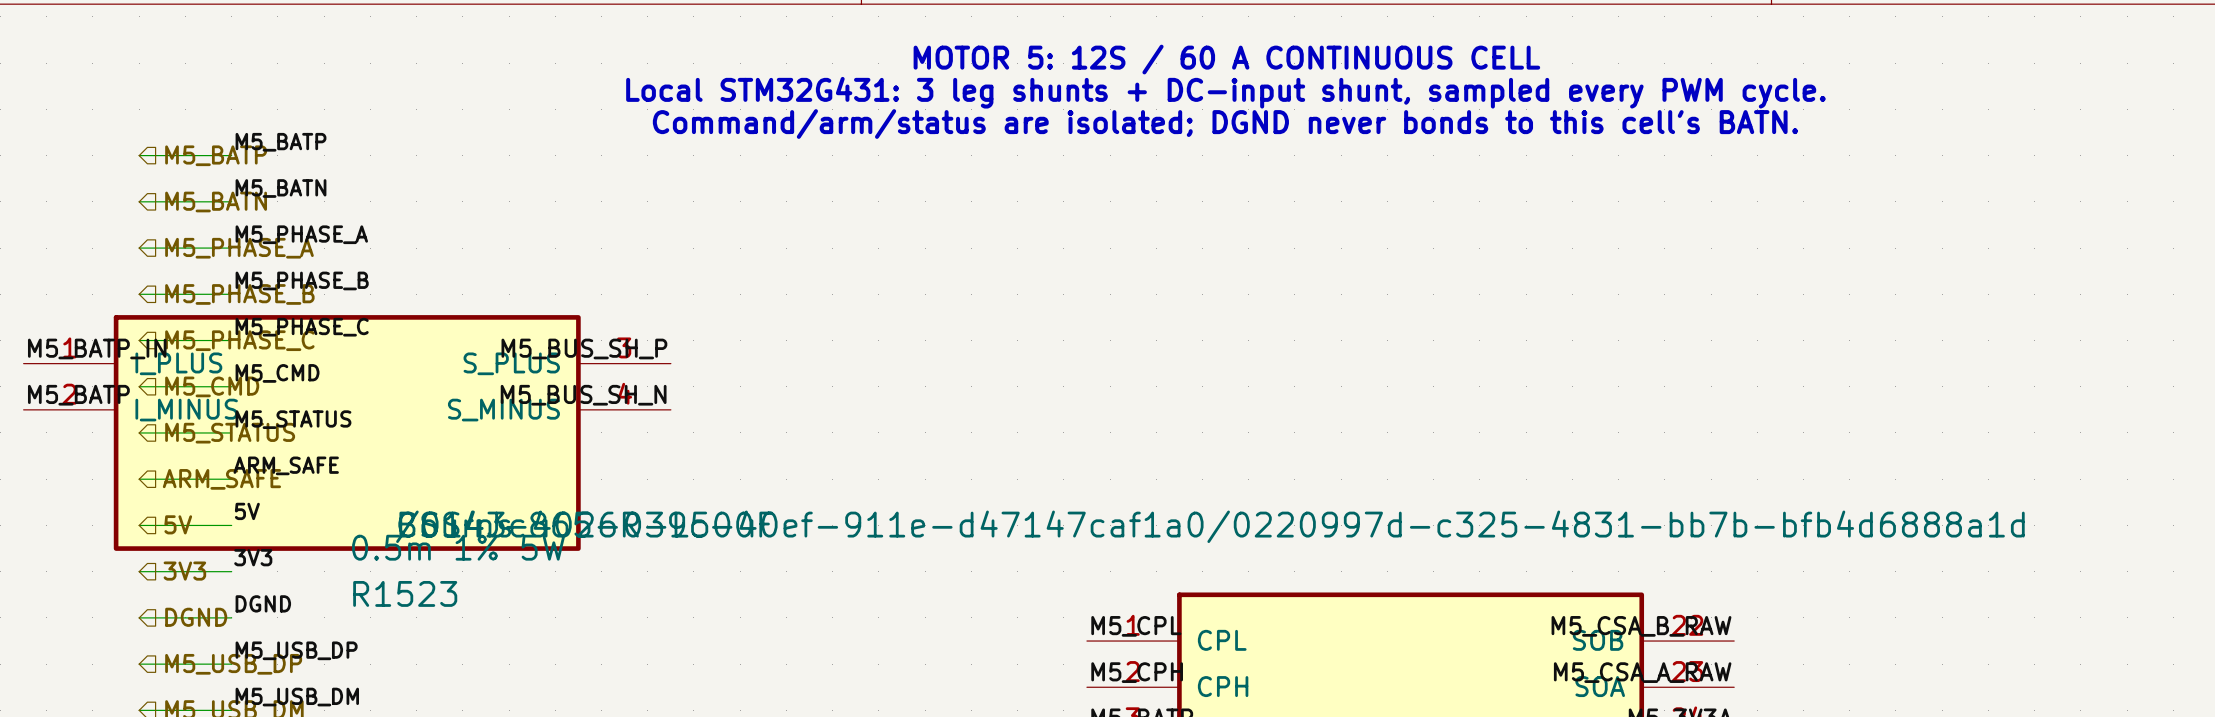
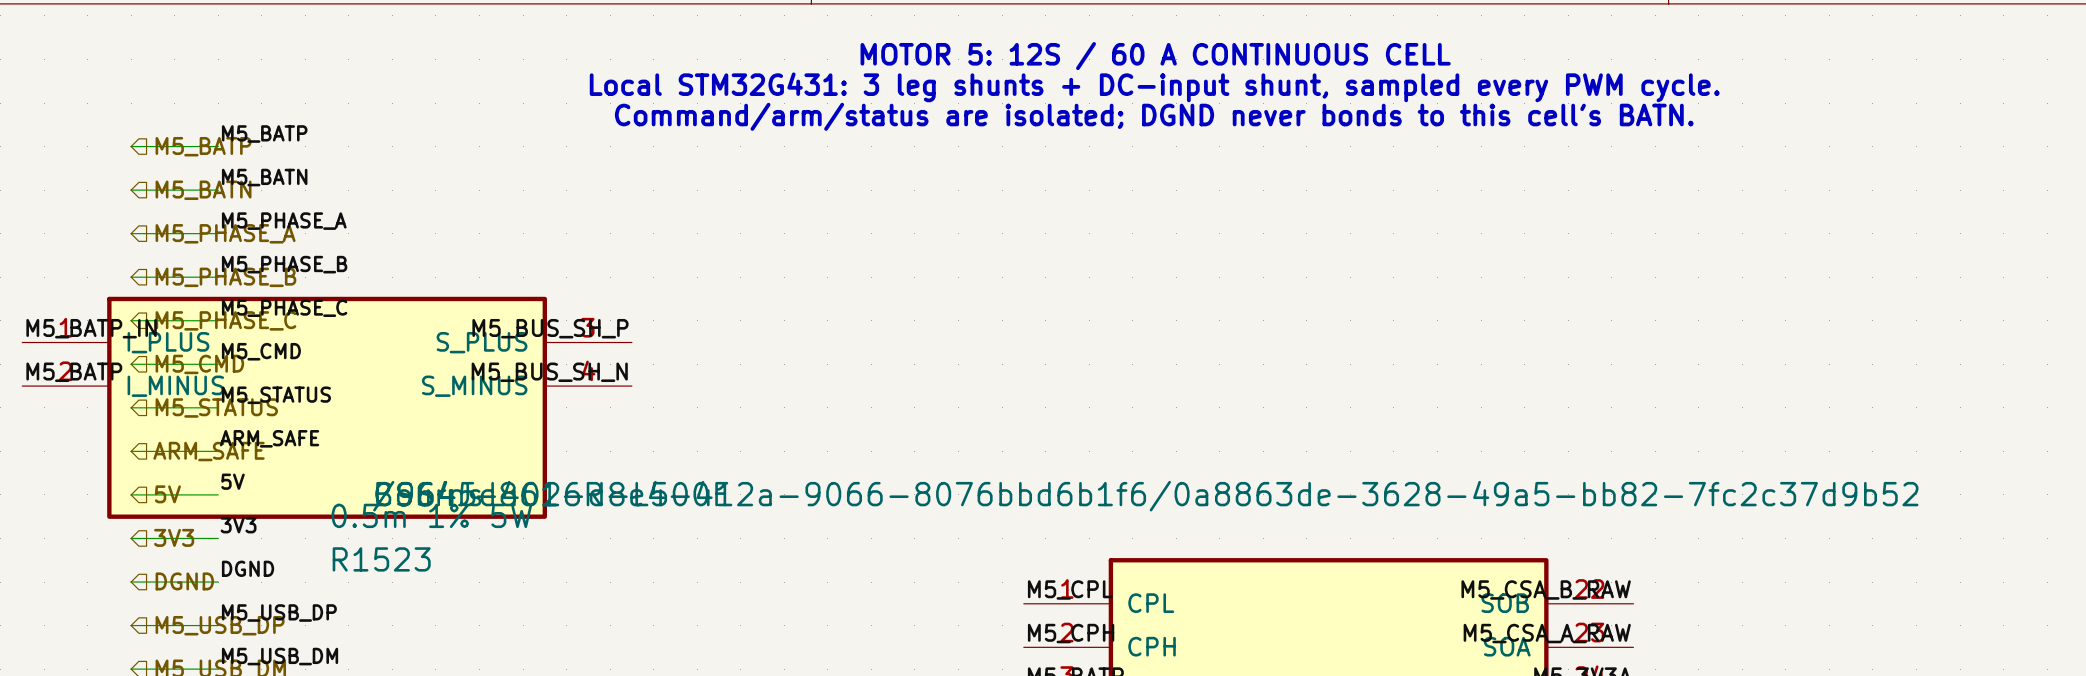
R1523 text: /0143c865-039c-40ef-911e-d47147caf1a0/0220997d-c325-4831-bb7b-bfb4d6888a1d (1210, 526) -> /9645d861-d8e4-412a-9066-8076bbd6b1f6/0a8863de-3628-49a5-bb82-7fc2c37d9b52 (1145, 496)

